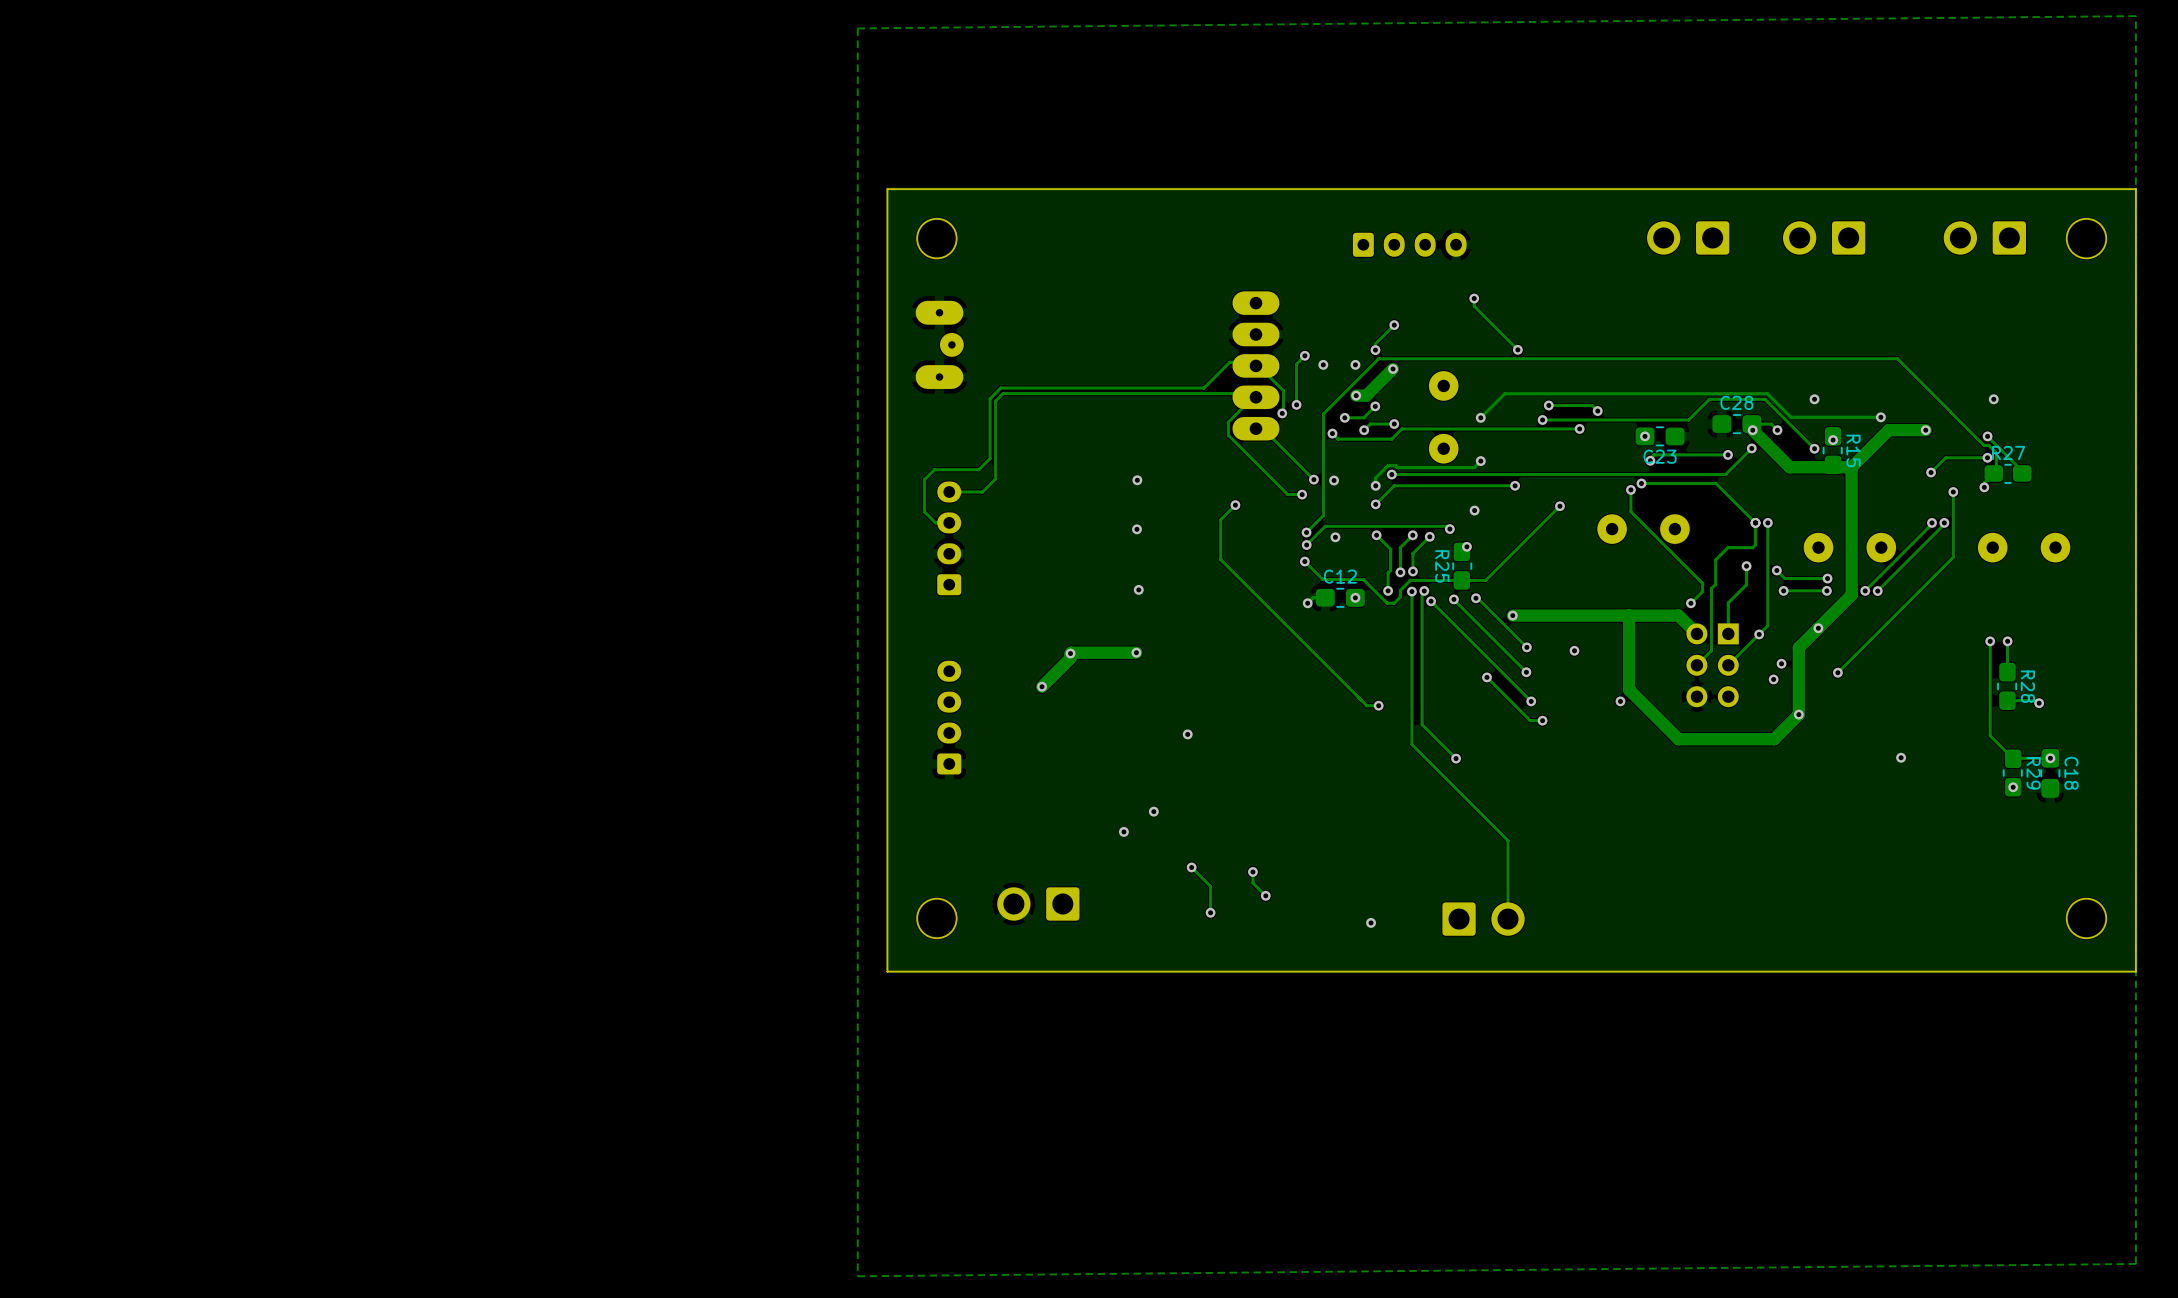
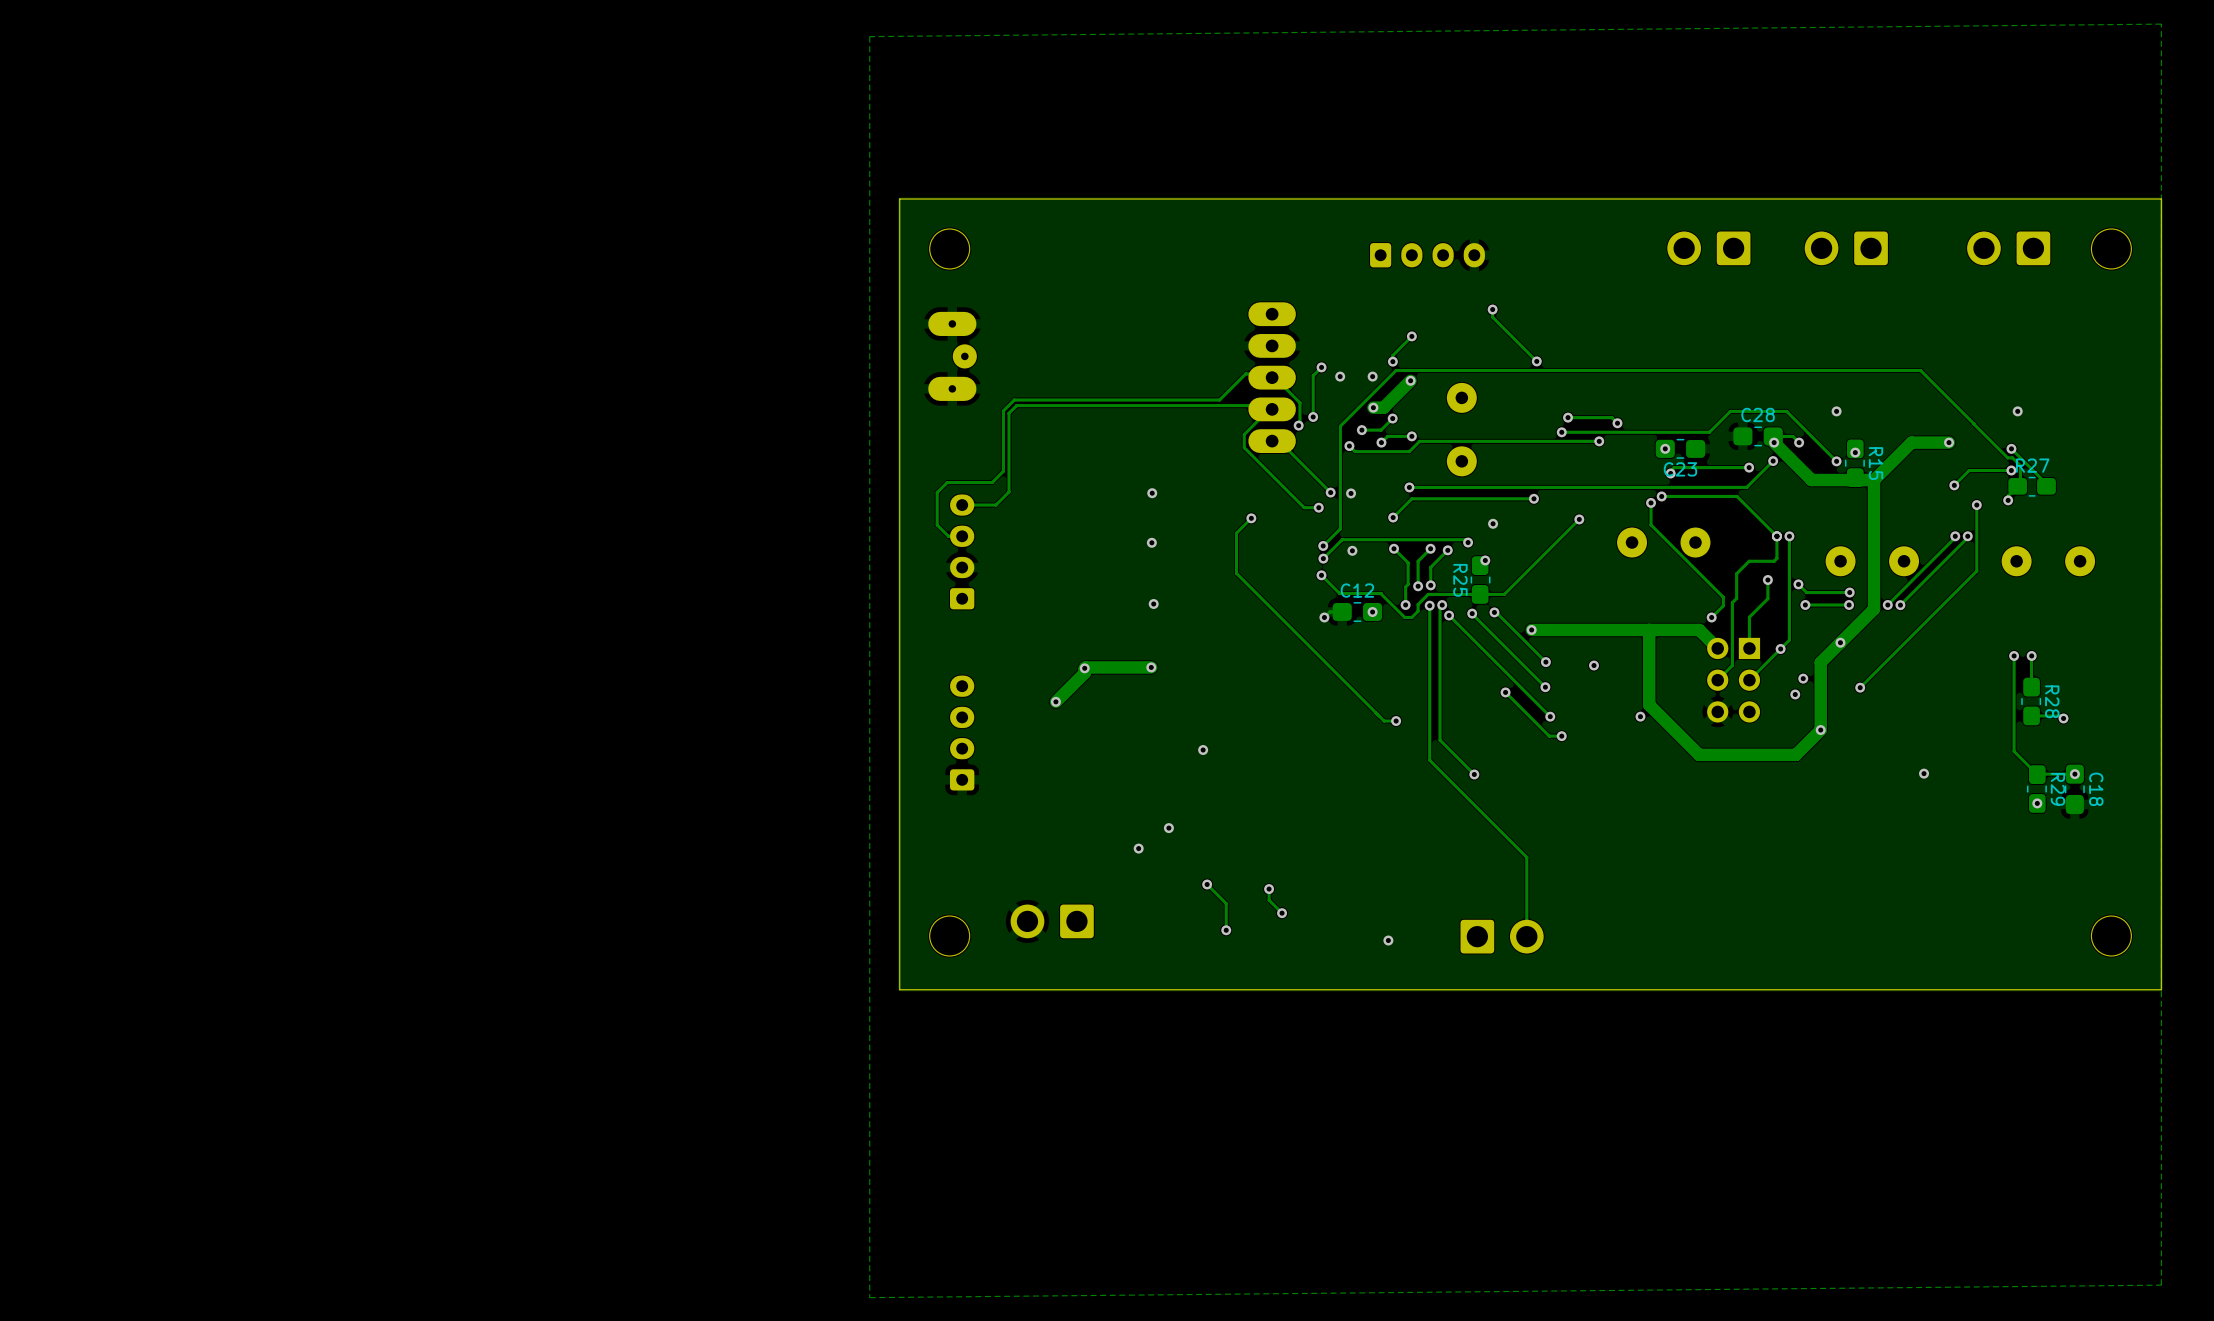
via: (1480, 417) -> none
track: (1880, 417) (1790, 417) (1767, 393) (1504, 393) (1480, 417) -> none
via: (1880, 417) -> none
track: (1480, 461) (1474, 467) (1397, 467) (1395, 465) (1388, 465) (1375, 477) (1375, 485) -> none
via: (1480, 461) -> none
via: (1375, 485) -> none

